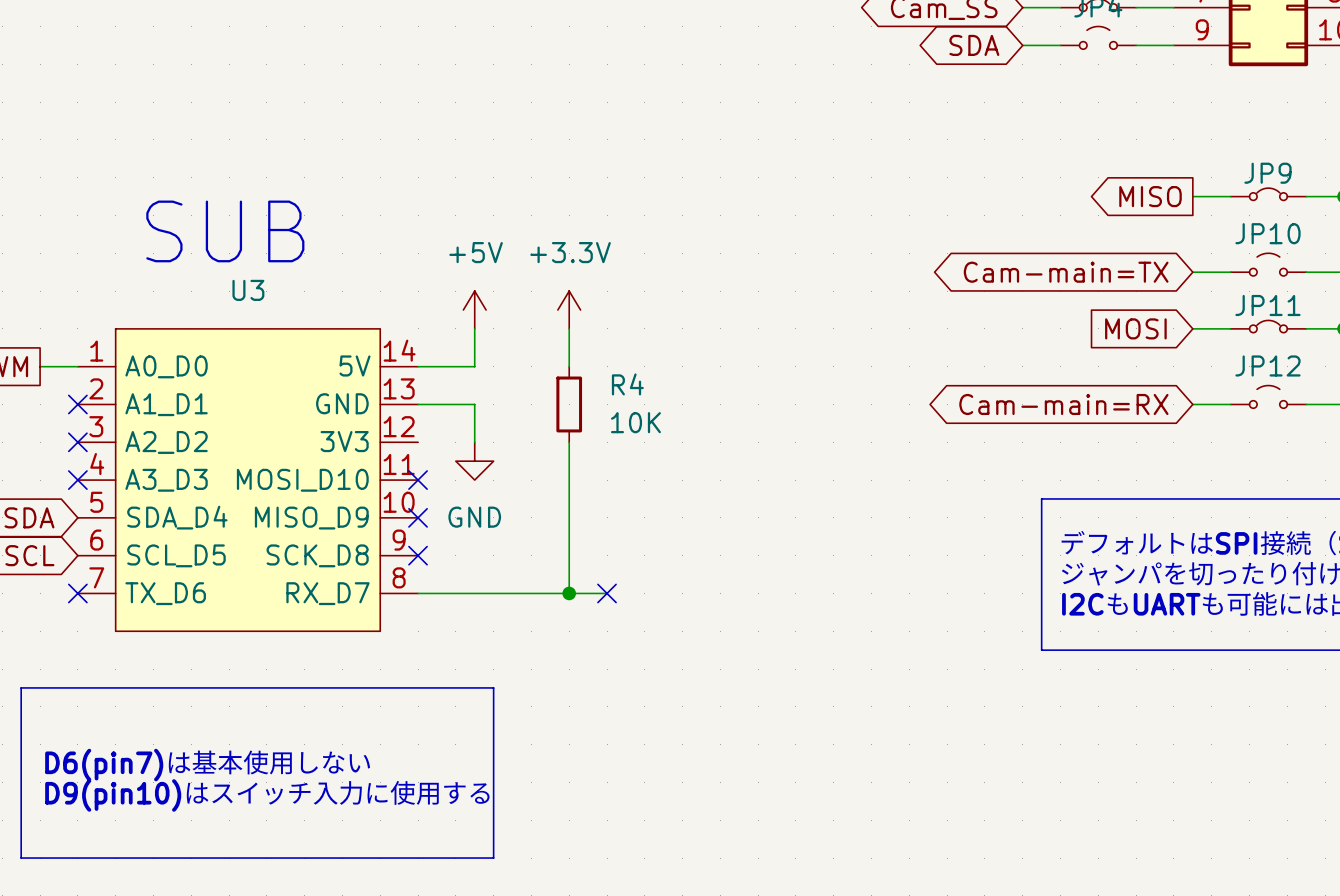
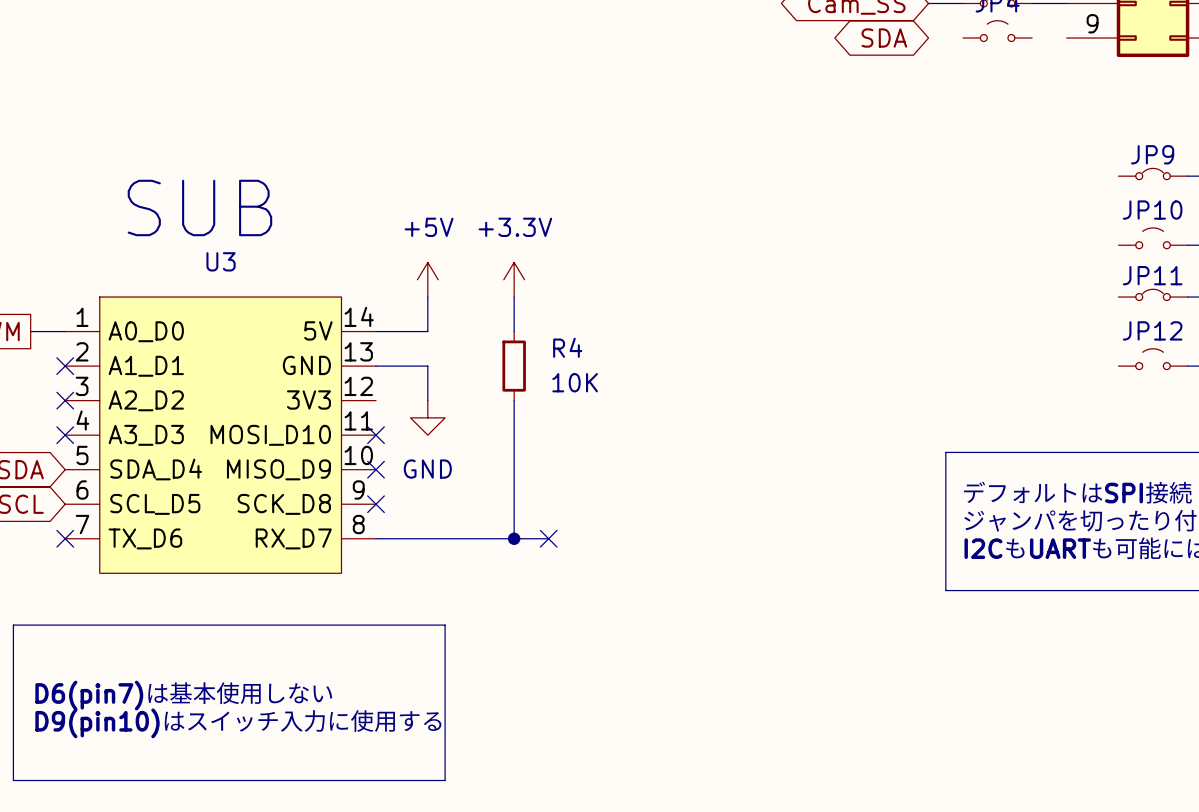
wire: (1022, 45) (1060, 45) -> none
wire: (1136, 45) (1173, 45) -> none
global label: MISO (1150, 196) -> none
wire: (1192, 196) (1230, 196) -> none
global label: Cam-main=TX (1066, 272) -> none
wire: (1192, 272) (1230, 272) -> none
global label: MOSI (1135, 328) -> none
wire: (1192, 328) (1230, 328) -> none
global label: Cam-main=RX (1063, 404) -> none
wire: (1192, 404) (1230, 404) -> none

